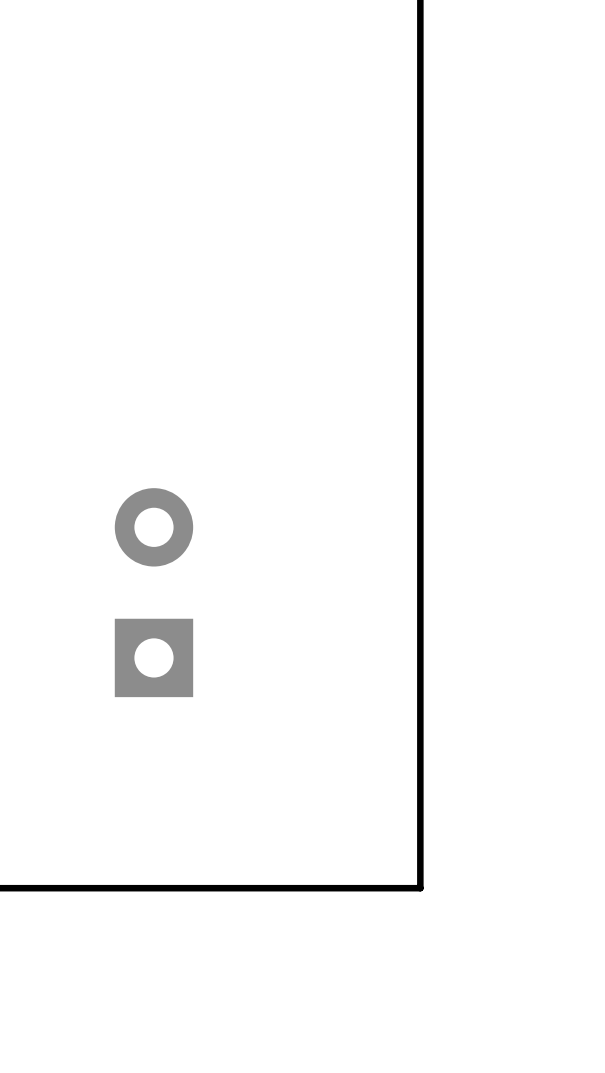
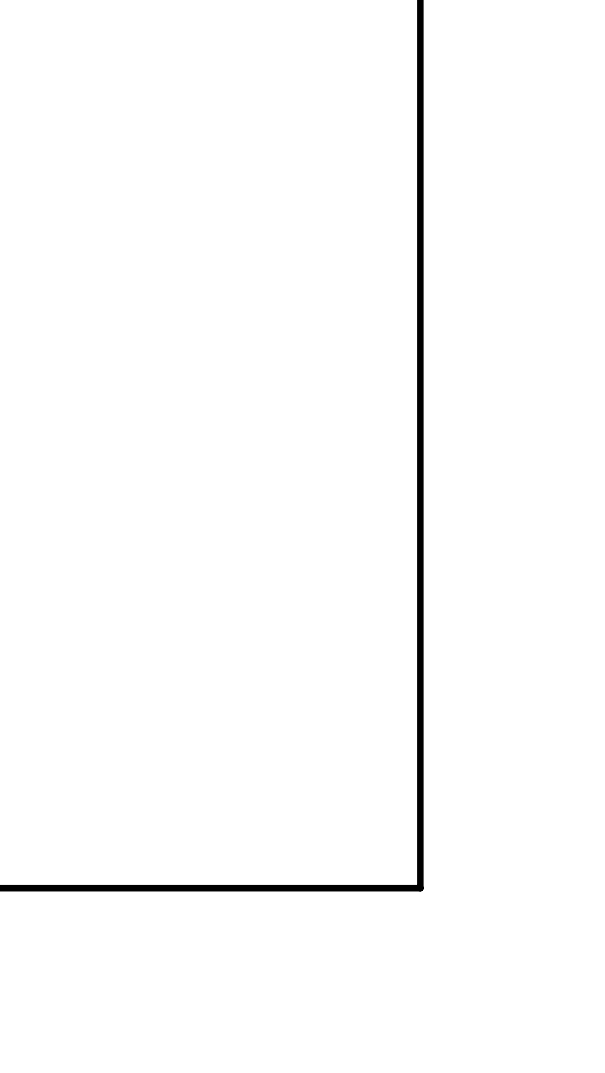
part: (153, 592) -> none

